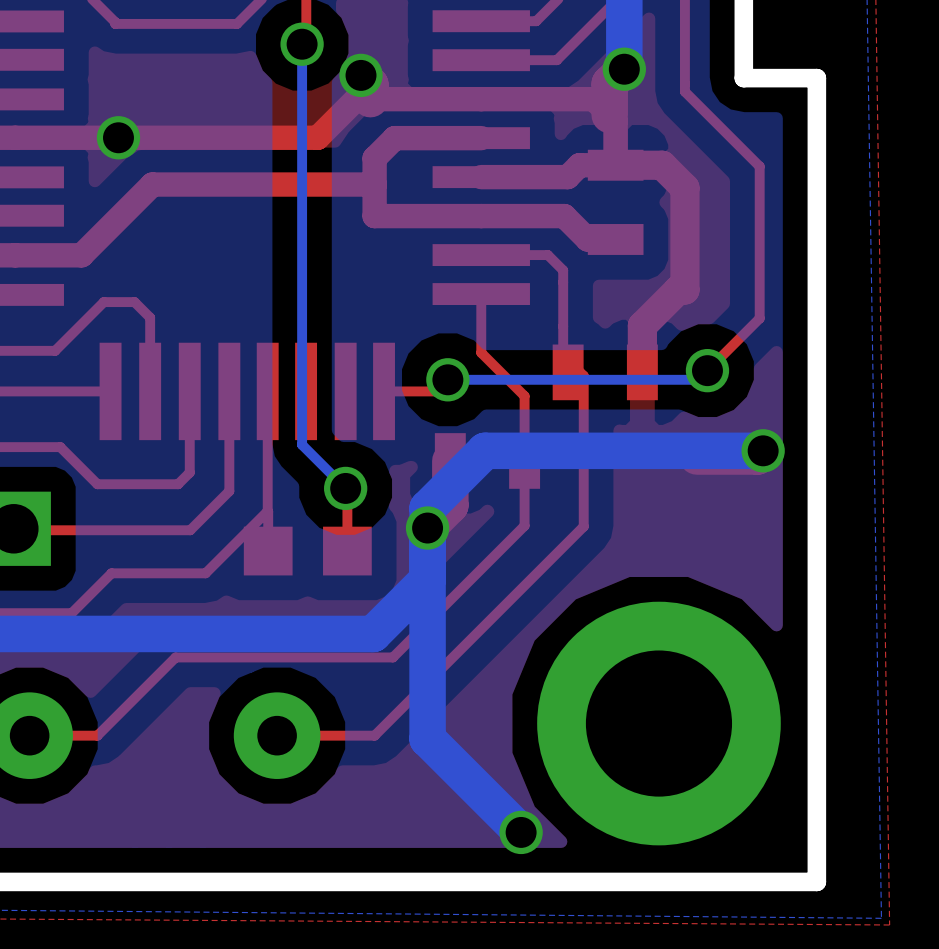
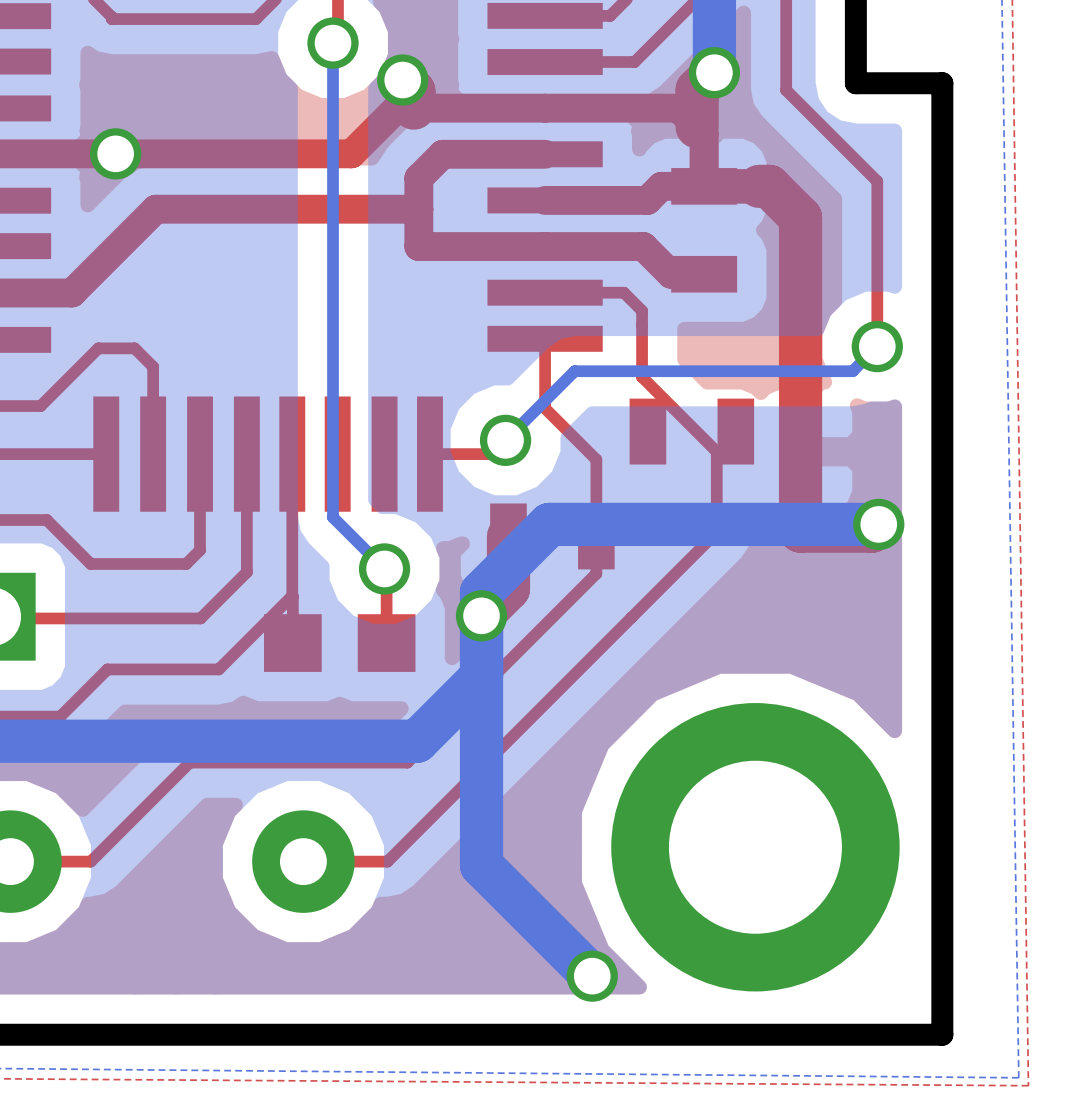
top track: (684, 84) (684, 91) (759, 166) (759, 318) (707, 370) -> (786, 90) (877, 181) (877, 346)
top track: (662, 165) (684, 188) (684, 289) (678, 289) (642, 325) (642, 372) -> (759, 186) (769, 186) (800, 217) (800, 531)
top track: (563, 326) (563, 355) (583, 375) (583, 526) (374, 735) (348, 735) -> (642, 377) (716, 451) (716, 532) (387, 861)
bottom track: (707, 370) (698, 379) (447, 379) -> (877, 346) (852, 371) (574, 371) (505, 440)
via position: (707, 370) -> (877, 346)
top track: (524, 492) (524, 525) (392, 657) (175, 657) -> (596, 573) (407, 762) (189, 762) (183, 769)

